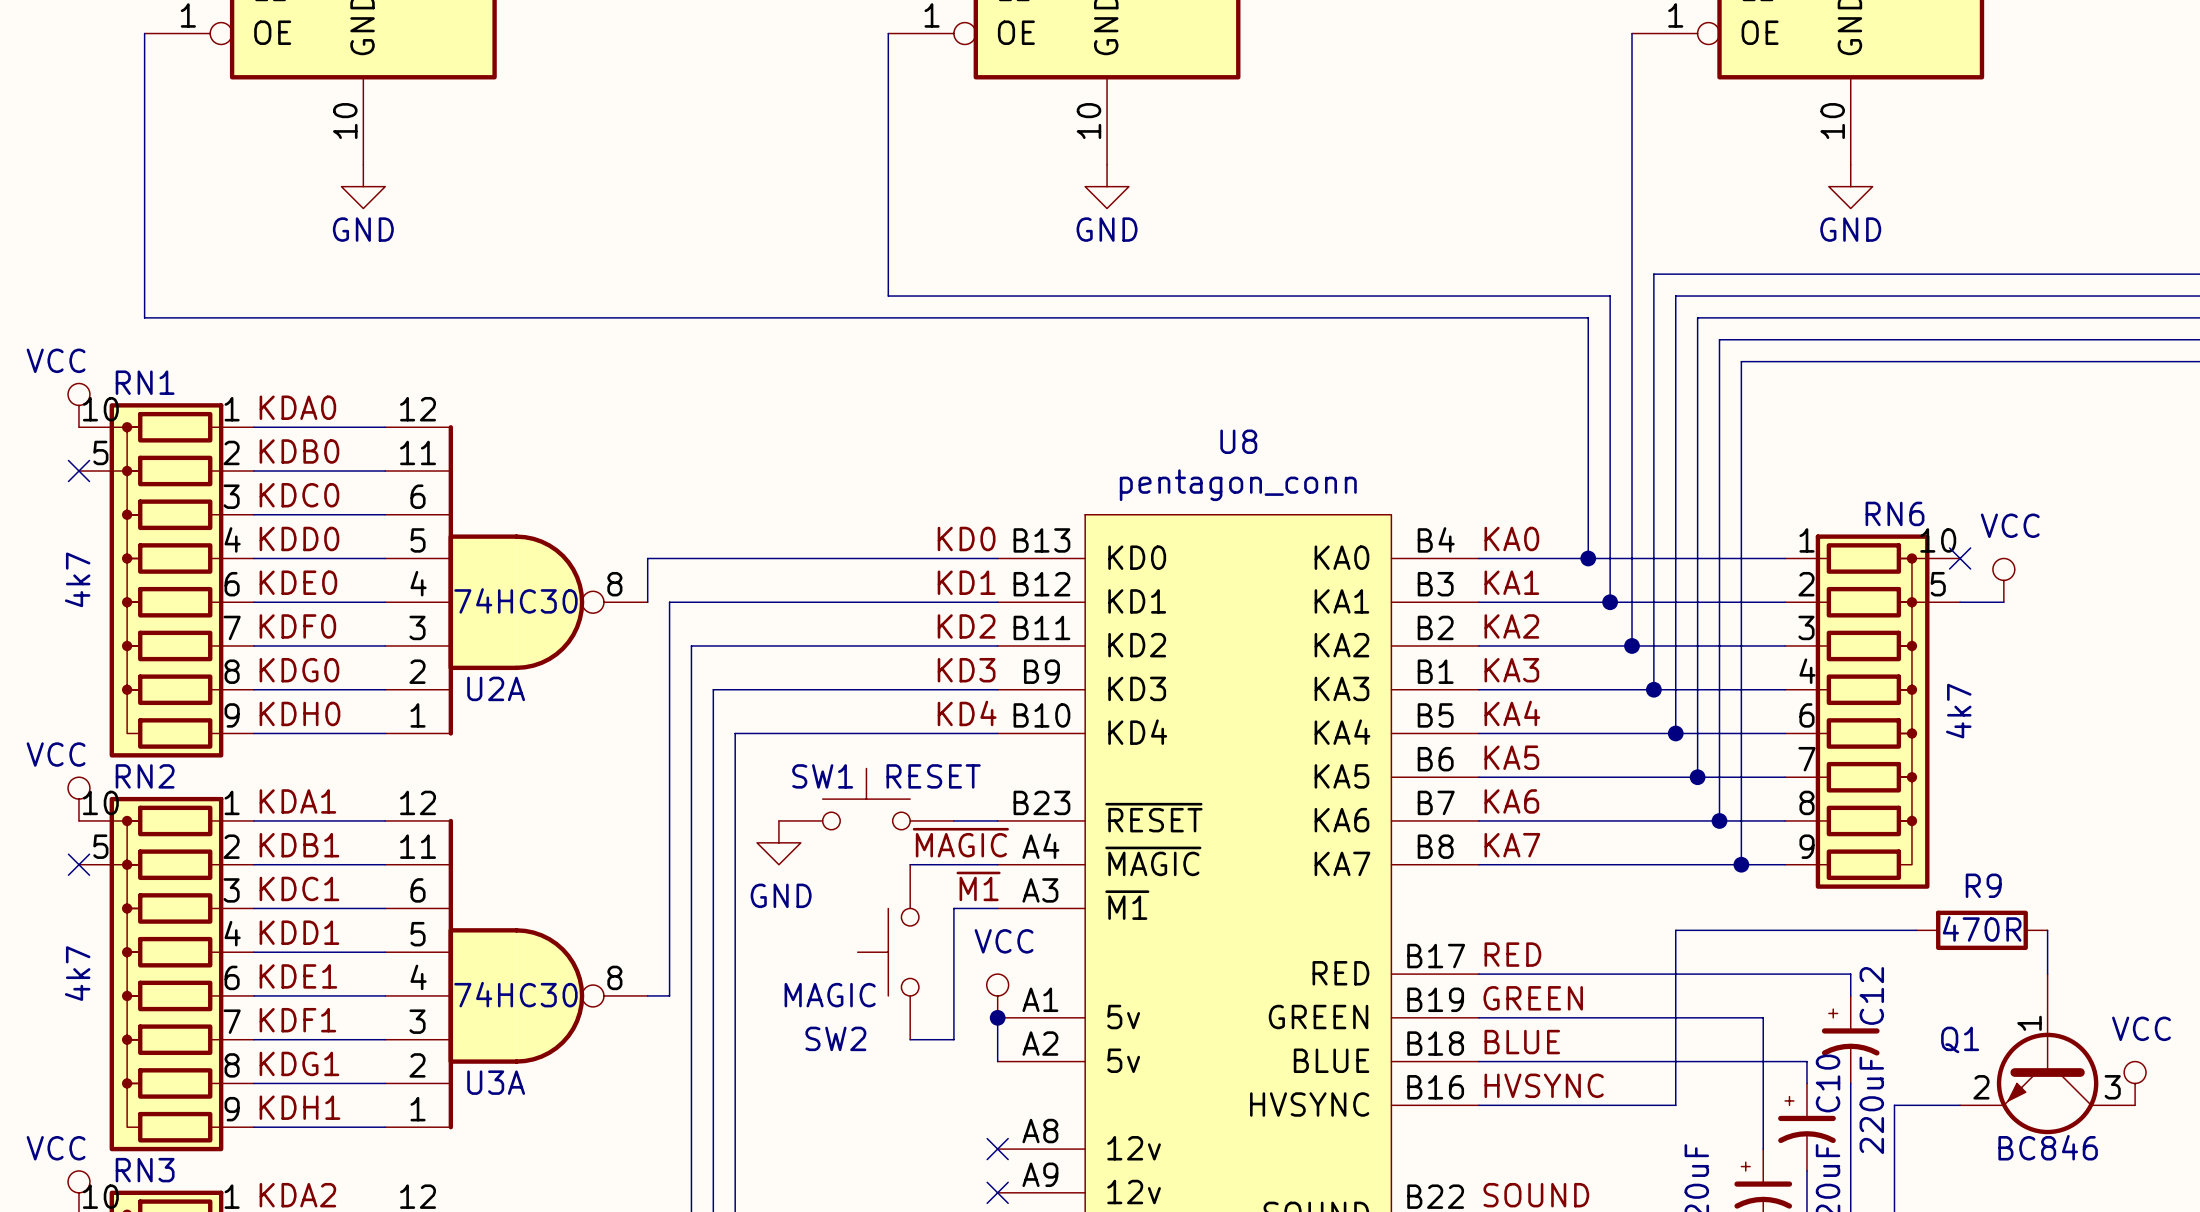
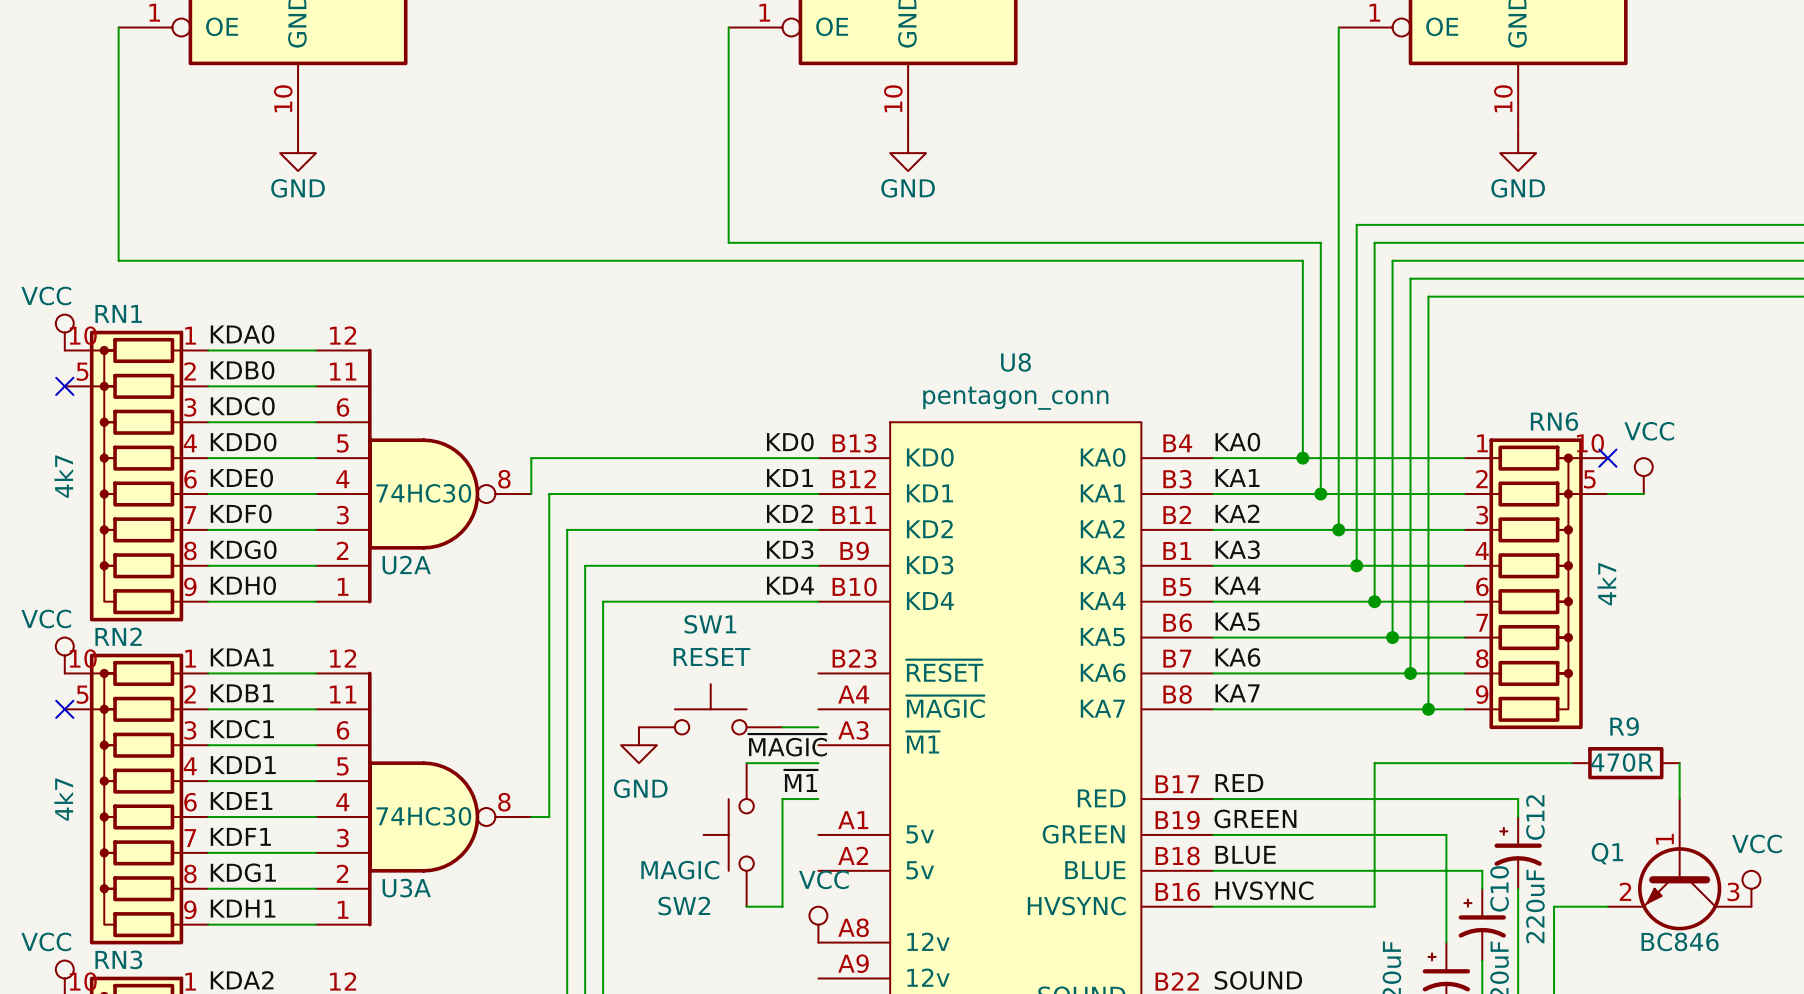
SW1 name position: SW1 (822, 776) -> SW1 (710, 624)
SW1 value position: RESET (933, 776) -> RESET (711, 657)
SW1 position: (866, 799) -> (710, 709)
wire: (953, 820) (997, 820) -> (782, 727) (818, 727)
power symbol position: GND (778, 842) -> GND (638, 745)
label position: ~{MAGIC} (960, 842) -> ~{MAGIC} (787, 745)
wire: (910, 864) (997, 864) -> (746, 763) (818, 763)
label position: ~{M1} (978, 886) -> ~{M1} (800, 780)
wire: (997, 908) (953, 908) (953, 974) -> (818, 799) (782, 799)
SW2 position: (888, 952) -> (728, 834)
power symbol position: VCC (997, 995) -> VCC (818, 924)
wire: (997, 1017) (997, 1061) -> none
junction: (997, 1017) -> none
wire: (910, 1039) (953, 1039) -> (746, 906) (782, 906) (782, 852)
no-connect mark: (997, 1149) -> none
no-connect mark: (997, 1192) -> none

